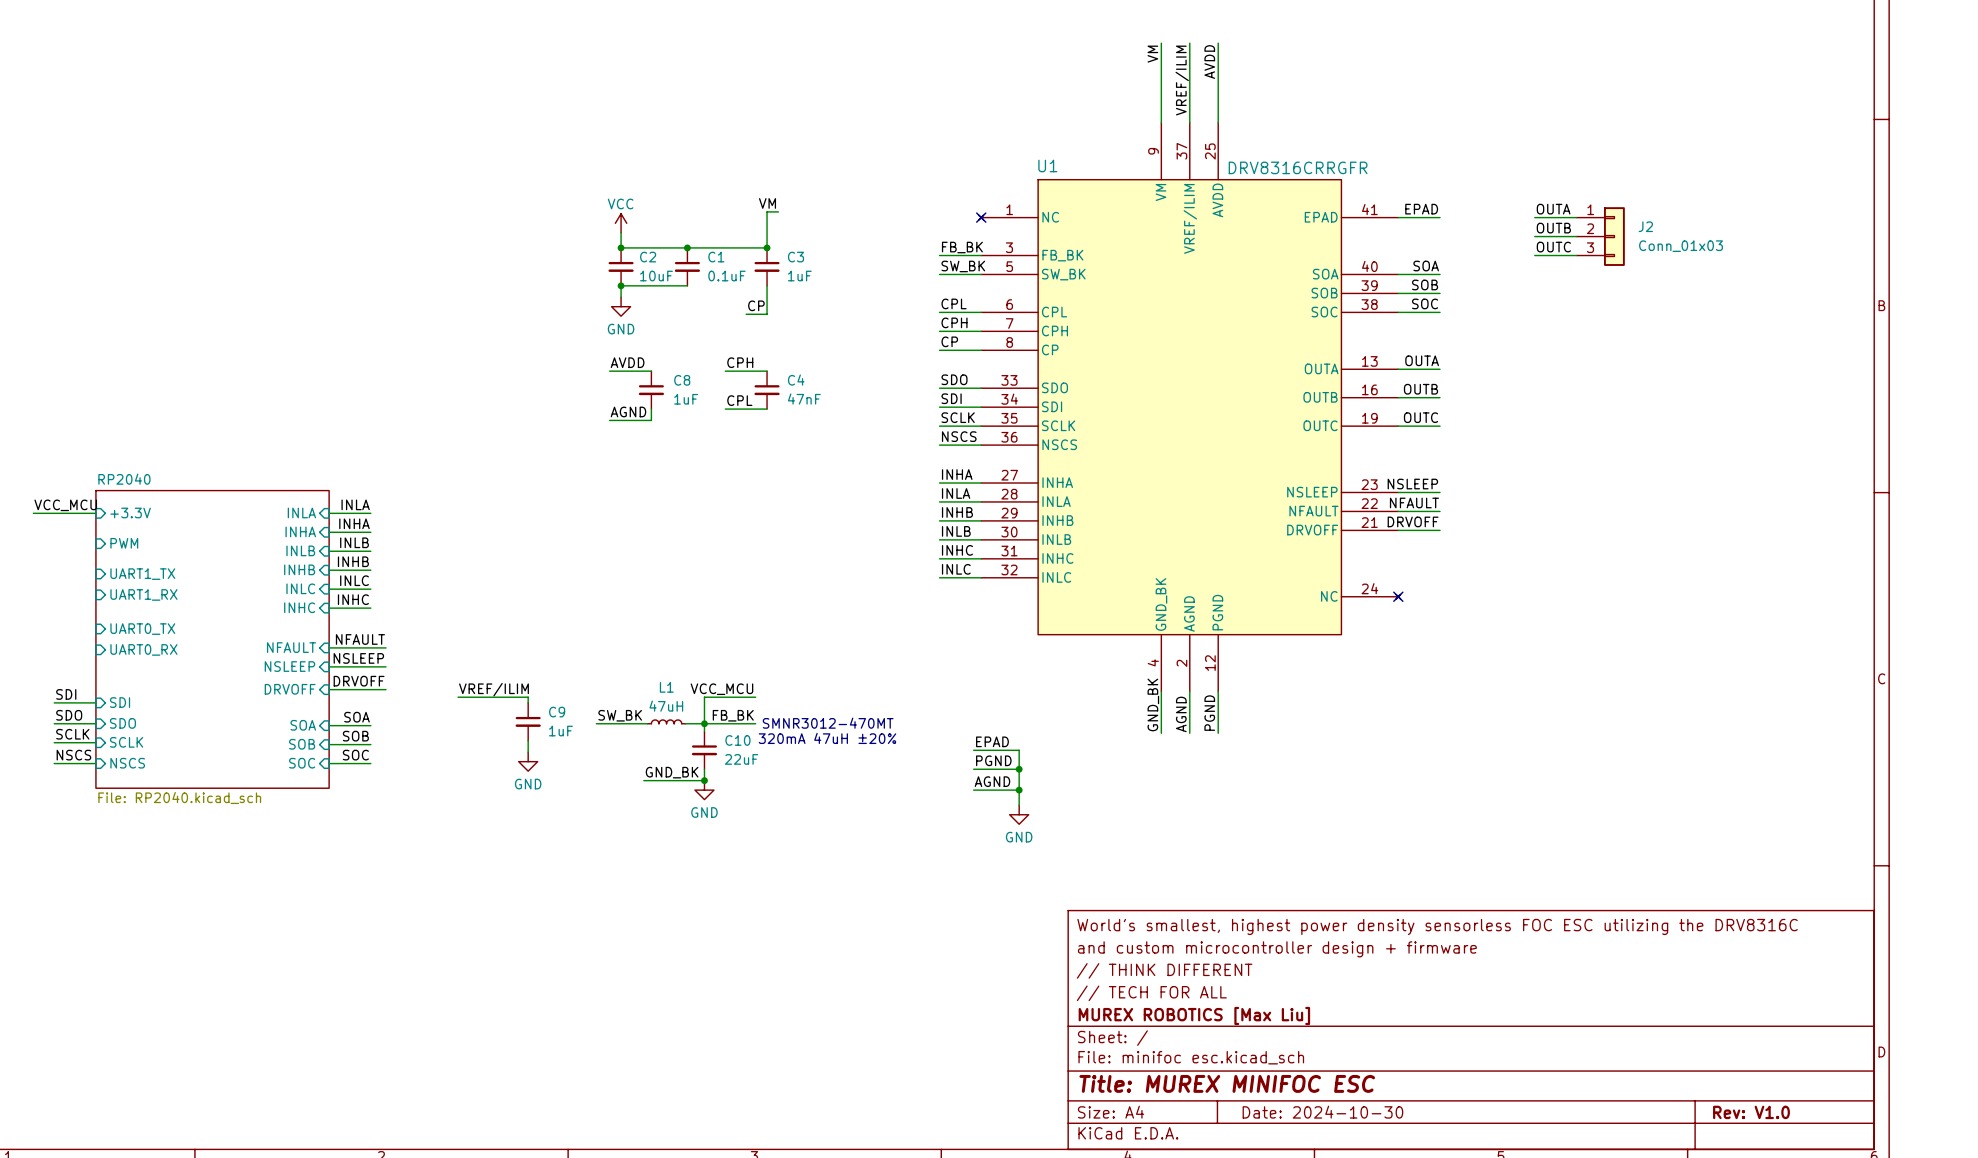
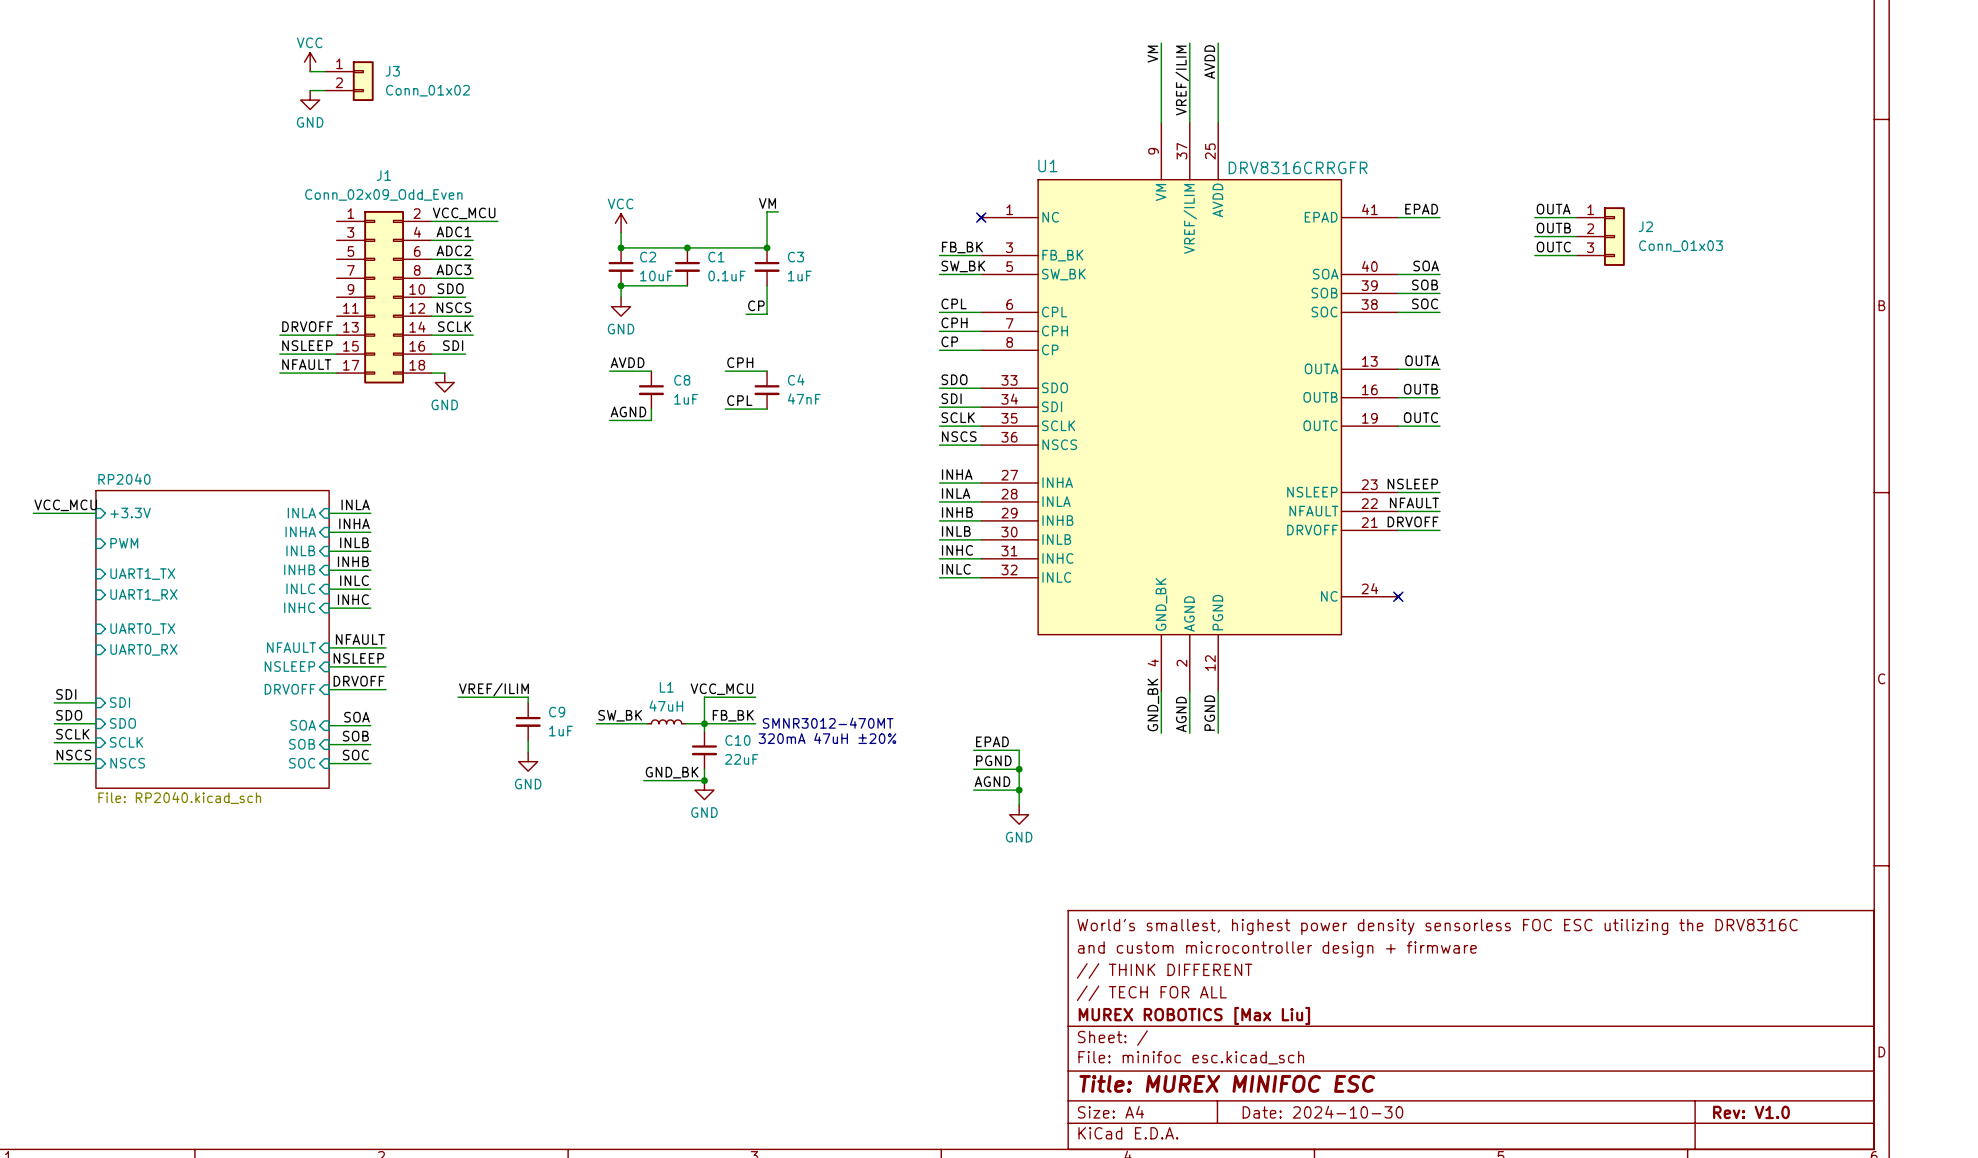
power symbol: none -> VCC (310, 62)
wire: none -> (310, 71) (325, 71)
J3: none -> Conn_01x02 (349, 81)
wire: none -> (310, 90) (325, 90)
power symbol: none -> GND (310, 100)
label: none -> VCC_MCU (464, 213)
wire: none -> (431, 221) (497, 221)
label: none -> ADC1 (453, 231)
wire: none -> (431, 240) (473, 240)
label: none -> ADC2 (453, 250)
wire: none -> (431, 259) (473, 259)
label: none -> ADC3 (453, 269)
wire: none -> (431, 278) (473, 278)
label: none -> SDO (450, 288)
J1: none -> Conn_02x09_Odd_Even (384, 297)
wire: none -> (431, 297) (465, 297)
label: none -> NSCS (453, 307)
wire: none -> (431, 316) (473, 316)
label: none -> DRVOFF (307, 326)
label: none -> SCLK (454, 326)
wire: none -> (279, 335) (336, 335)
wire: none -> (431, 335) (473, 335)
label: none -> NSLEEP (307, 345)
label: none -> SDI (453, 345)
wire: none -> (279, 354) (336, 354)
wire: none -> (431, 354) (465, 354)
label: none -> NFAULT (306, 364)
wire: none -> (279, 373) (336, 373)
wire: none -> (431, 373) (444, 373)
power symbol: none -> GND (444, 382)

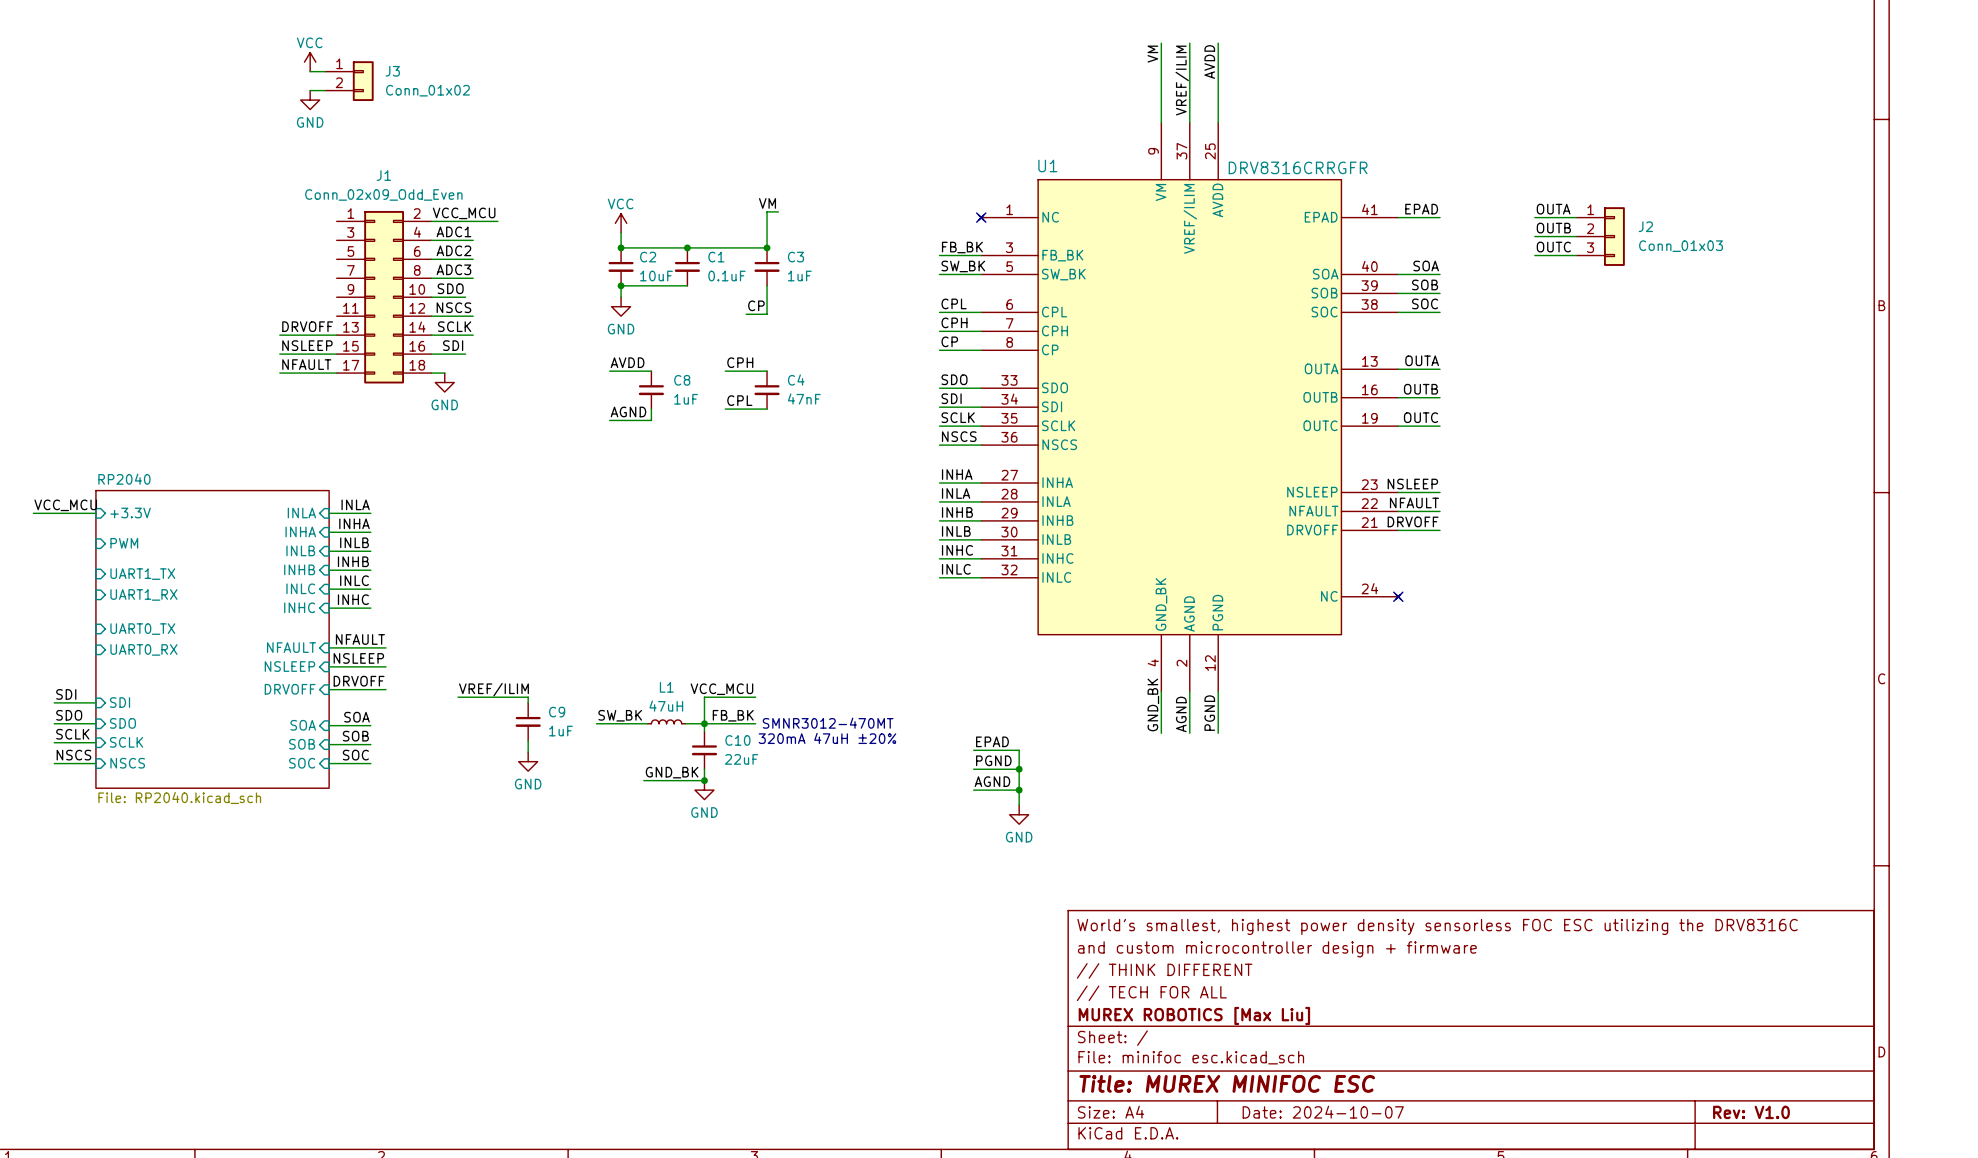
title block: Date: 2024-10-30 (1322, 1112) -> Date: 2024-10-07 (1323, 1112)

